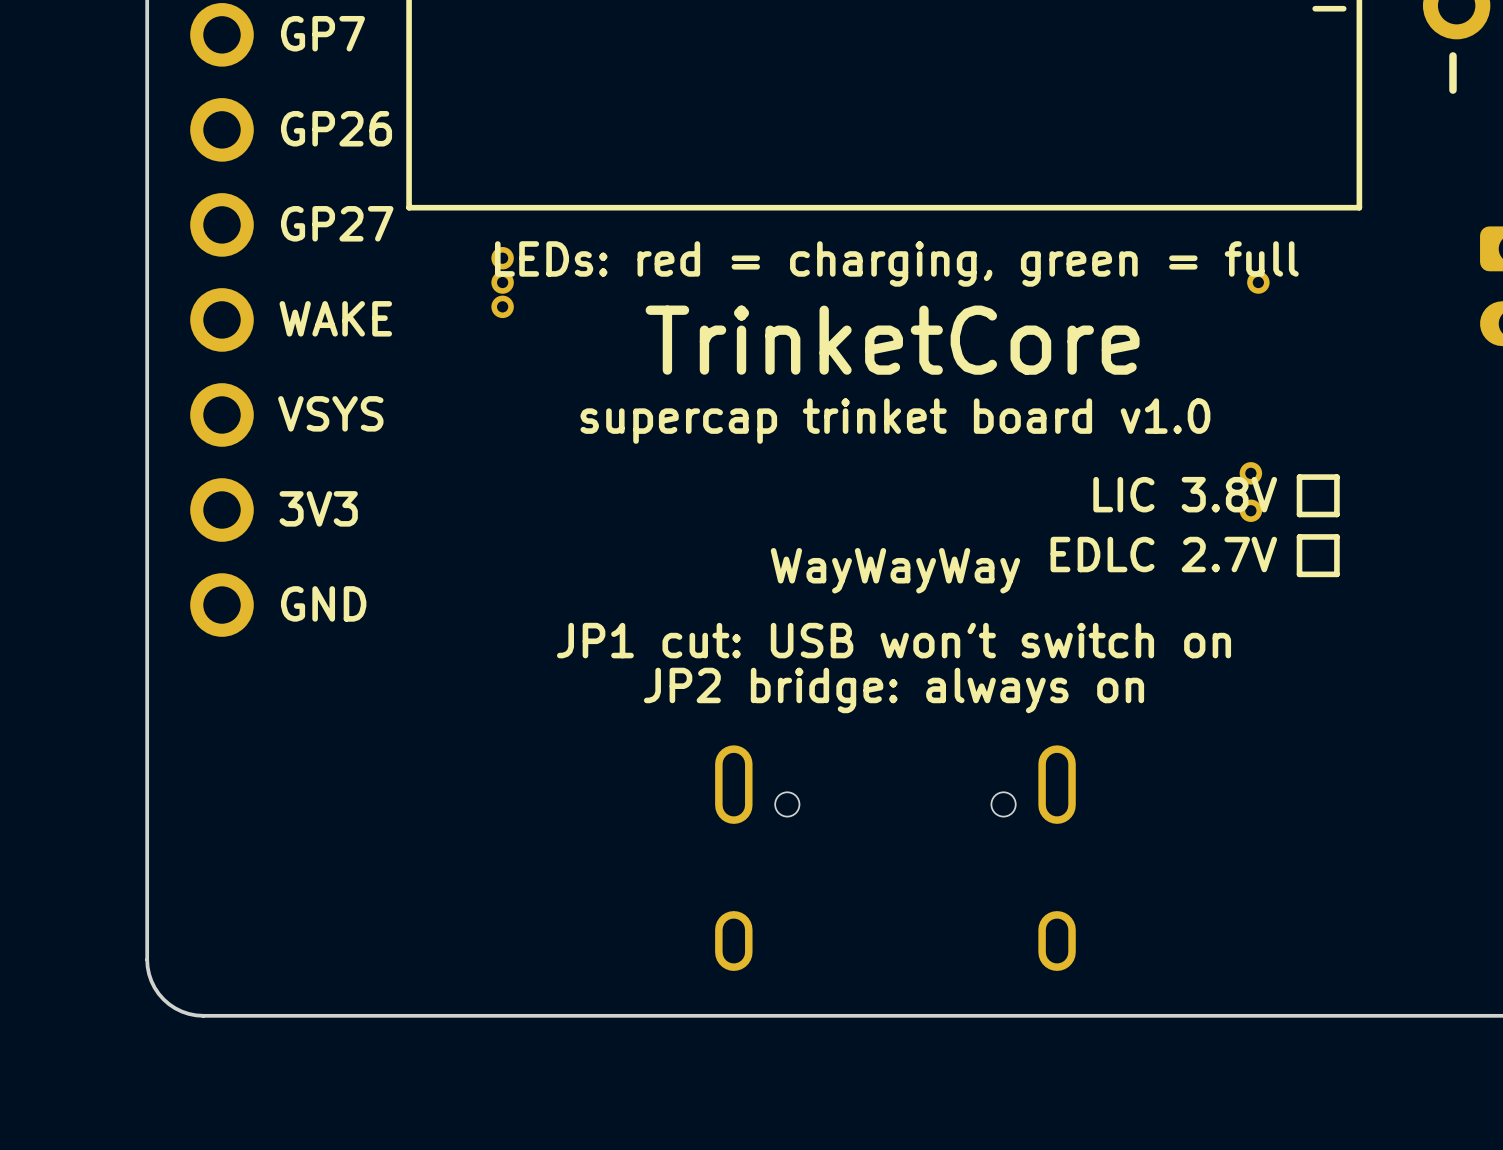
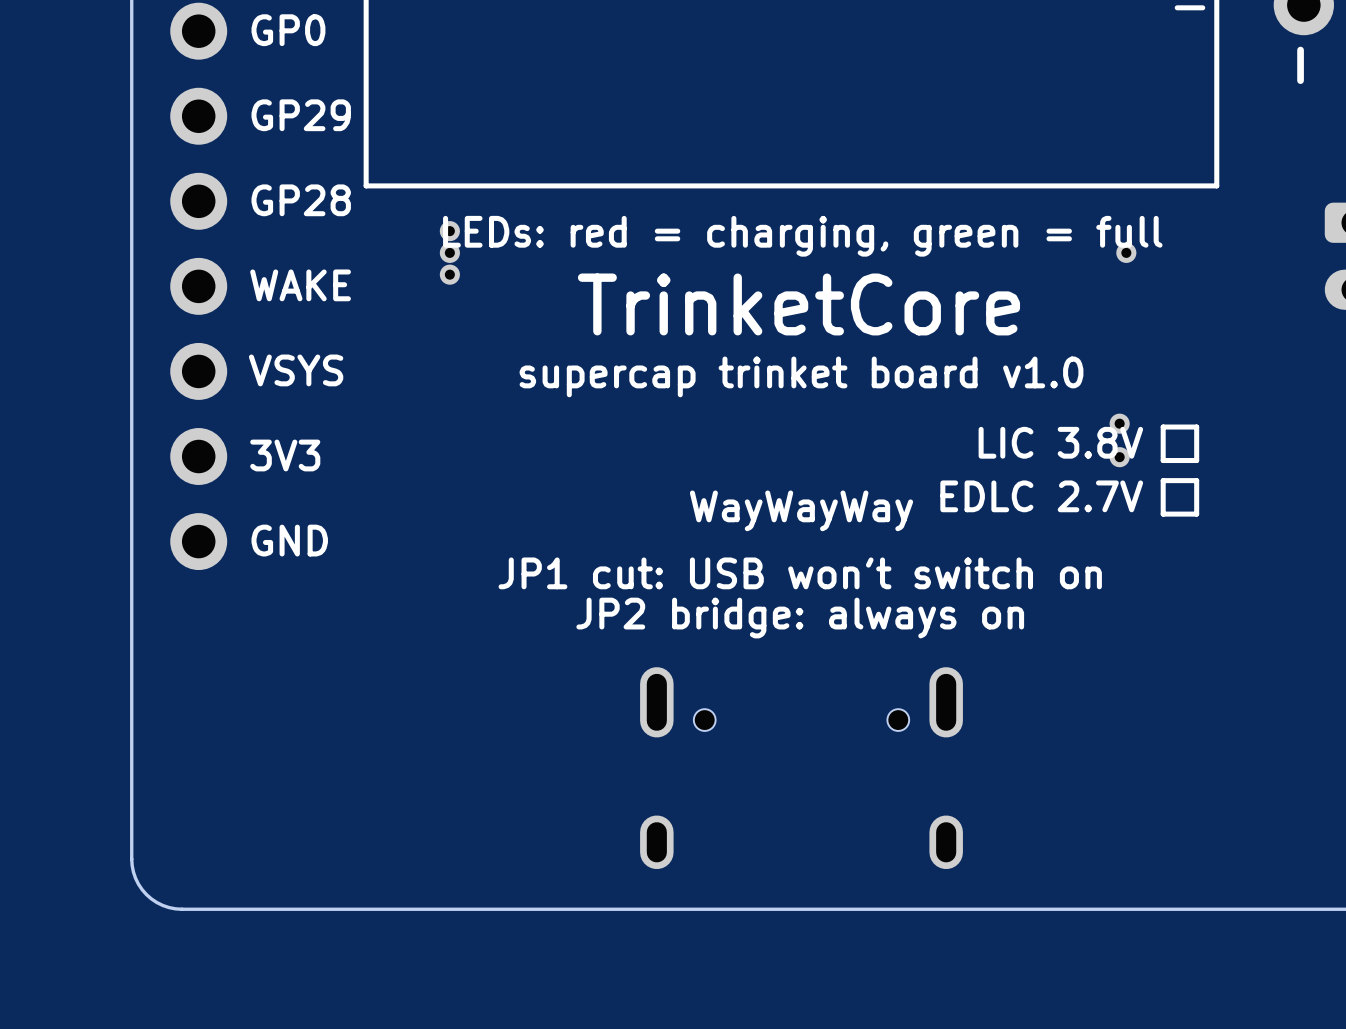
text: GP7 (322, 33) -> GP0 (288, 30)
text: GP26 (336, 128) -> GP29 (301, 115)
text: GP27 (337, 223) -> GP28 (301, 200)

